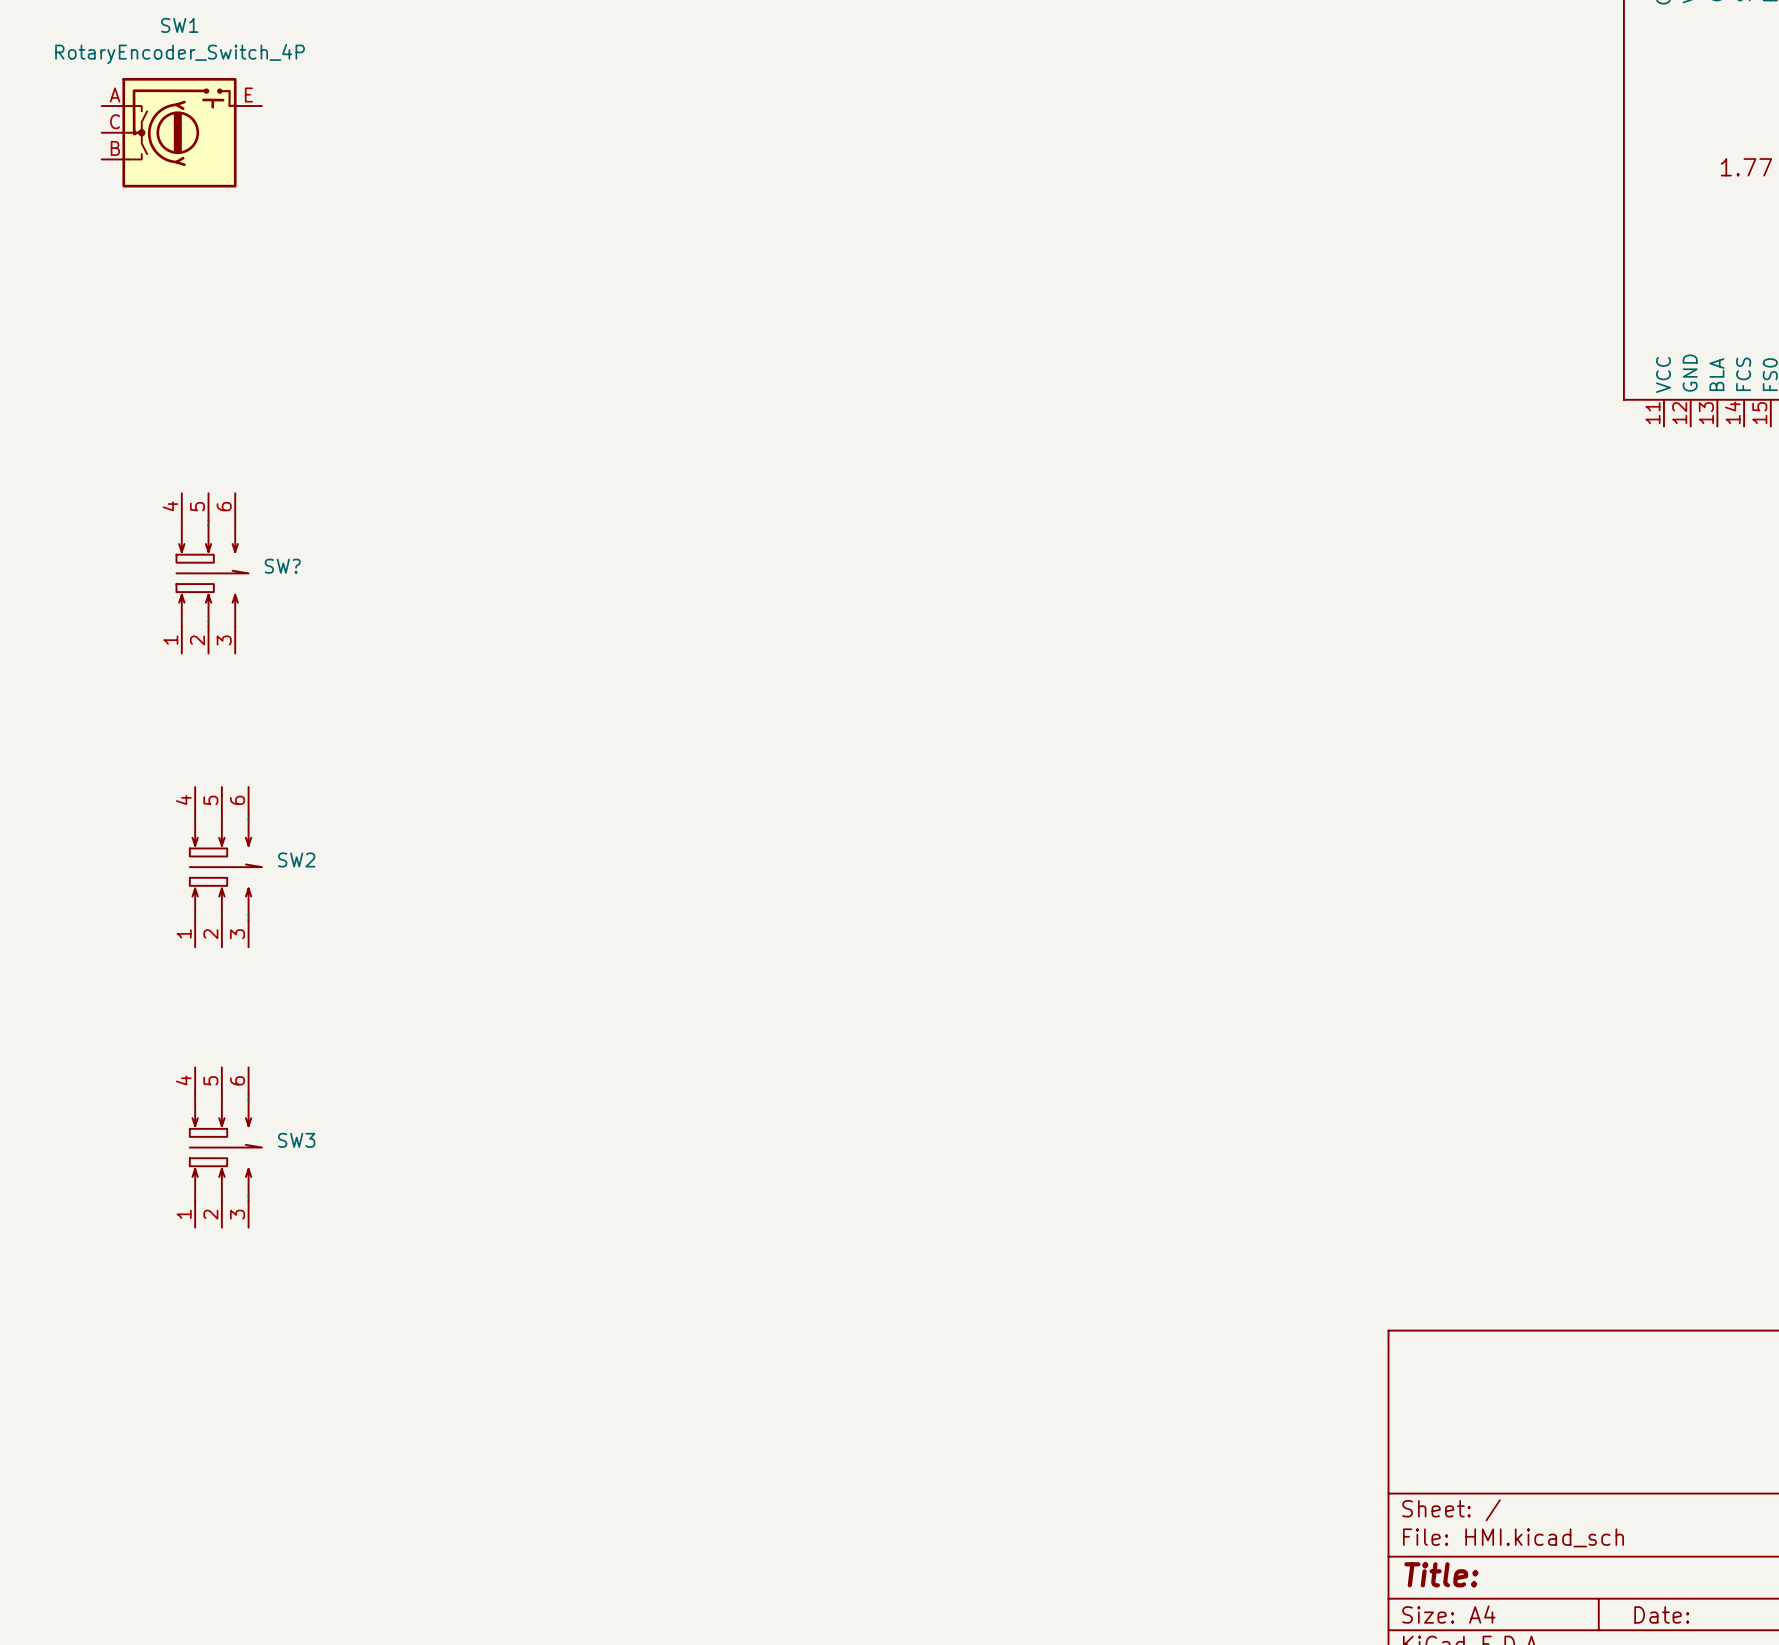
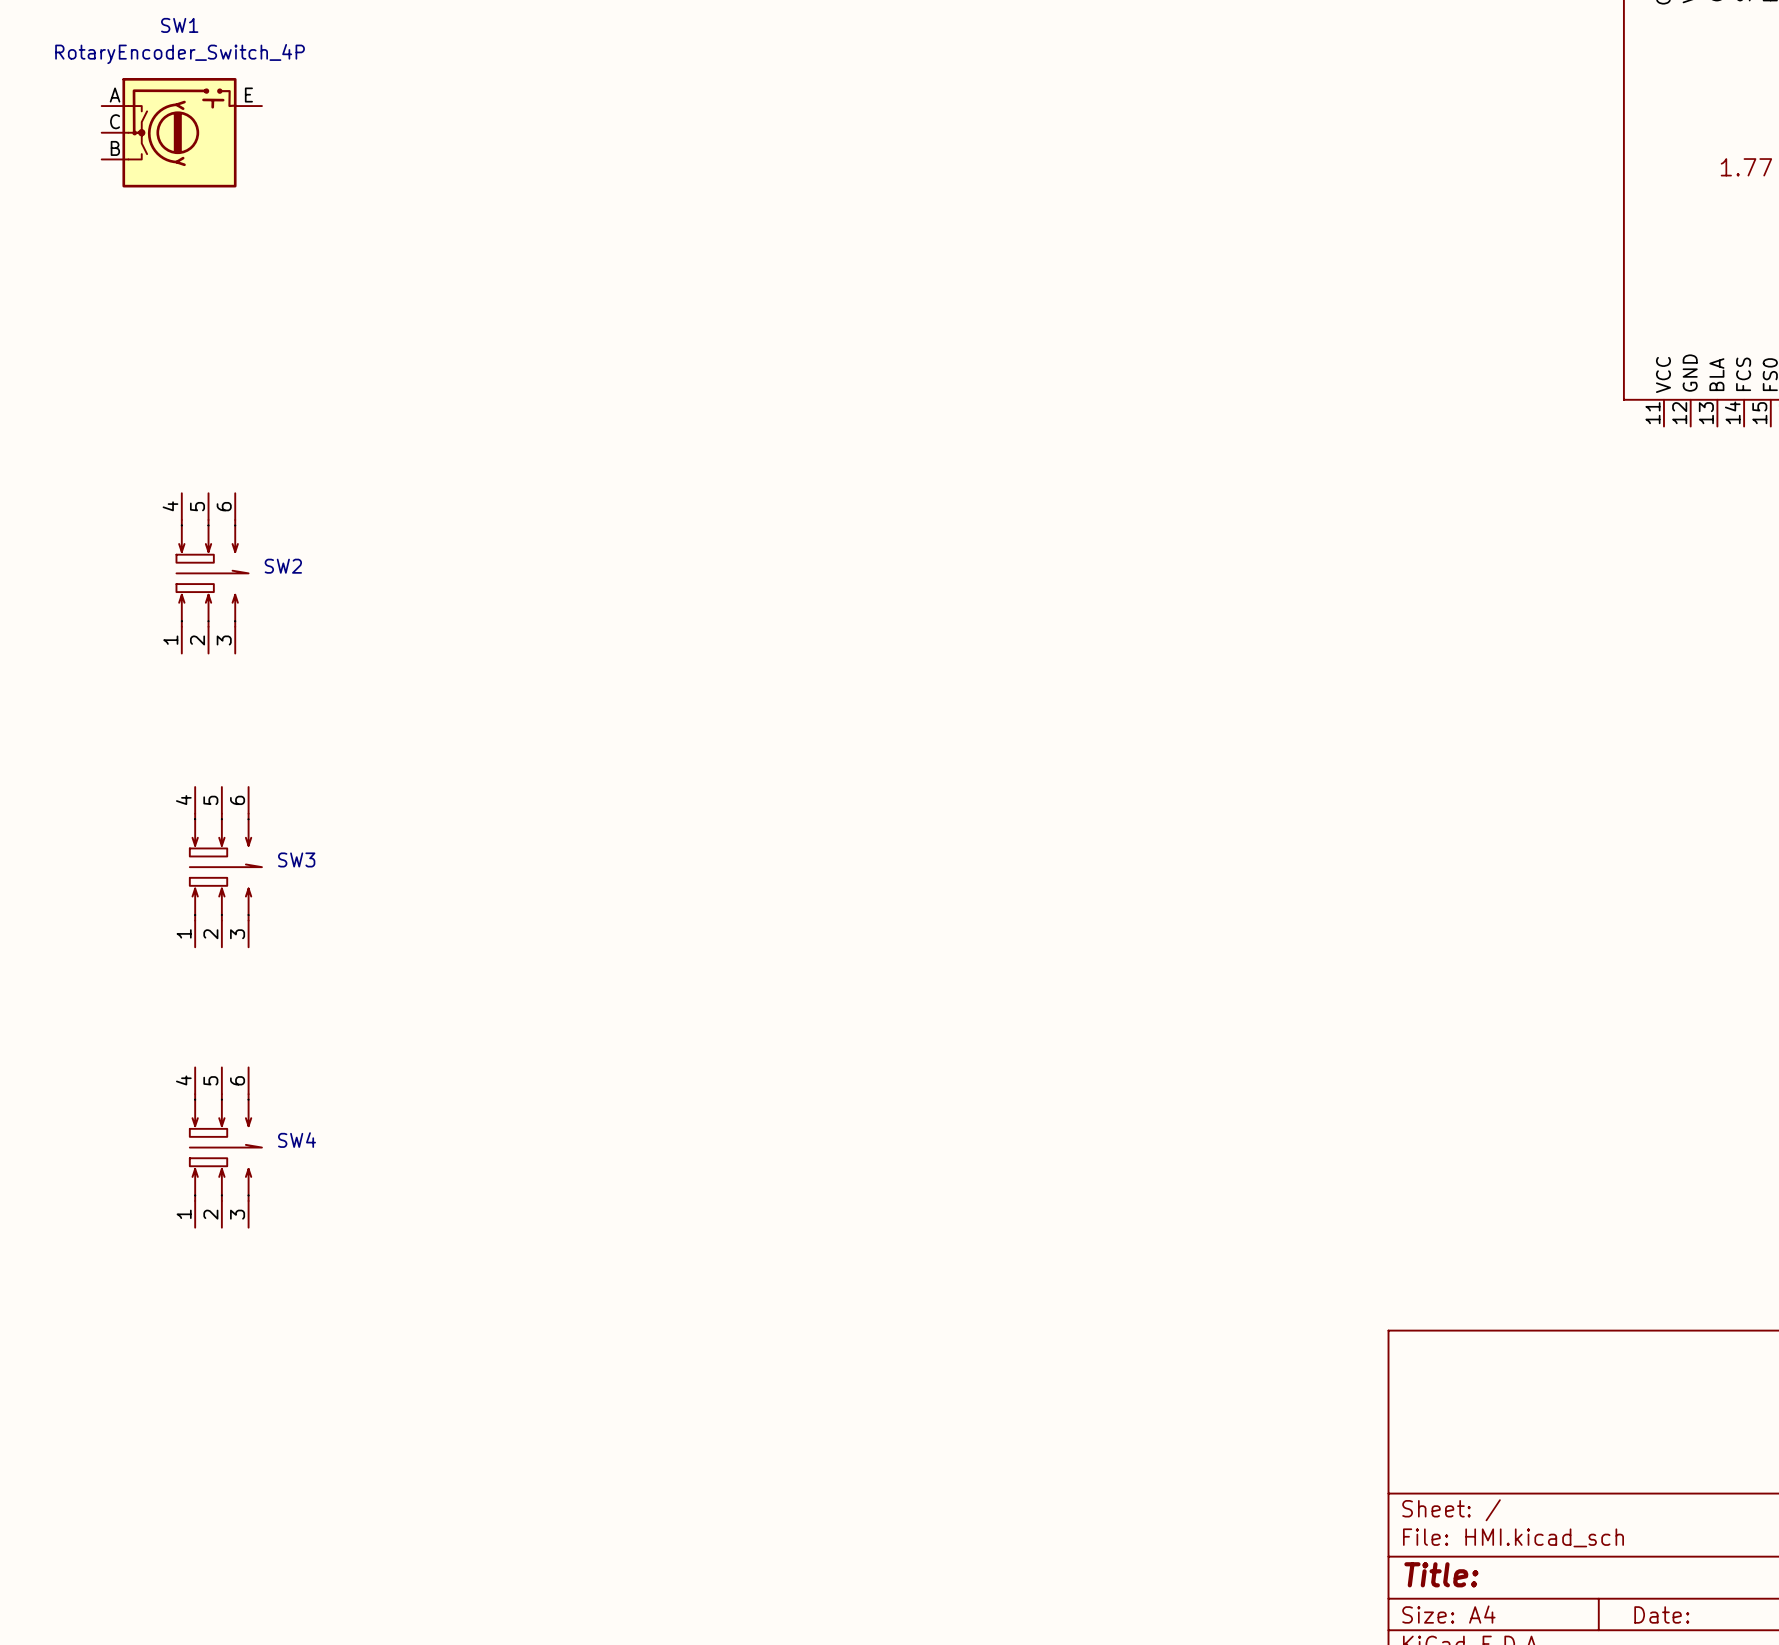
SW? name: SW? (282, 566) -> SW2 (283, 566)
SW2 name: SW2 (296, 859) -> SW3 (296, 859)
SW3 name: SW3 (296, 1140) -> SW4 (297, 1140)

